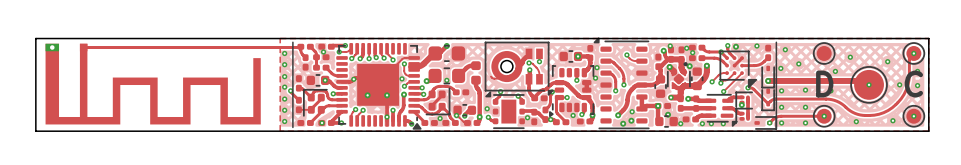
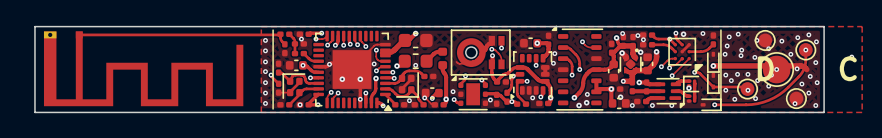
board edge: (887, 38) (928, 38) (928, 131) (887, 131) -> (824, 26) (824, 112)
via: none -> (738, 34)
via: none -> (808, 34)
via: none -> (797, 37)
via: none -> (756, 40)
part: (913, 53) -> none
via: (913, 53) -> none
via: none -> (781, 41)
via: none -> (816, 41)
track: (911, 56) (909, 79) (904, 94) (892, 107) (879, 114) (857, 114) (839, 102) (828, 99) (775, 99) (768, 103) -> (747, 89) (744, 87) (713, 87)
via: (850, 57) -> none
via: none -> (727, 45)
via: (887, 61) -> none
via: none -> (768, 48)
part: none -> (805, 50)
via: none -> (805, 50)
via: none -> (790, 54)
via: none -> (741, 55)
via: none -> (754, 57)
via: (835, 71) -> none
via: none -> (815, 62)
via: none -> (776, 69)
via: none -> (797, 68)
part position: (869, 84) -> (776, 69)
via: (869, 84) -> none
via: (899, 84) -> none
via: (917, 85) -> none
via: none -> (737, 74)
via: none -> (810, 76)
via: none -> (731, 80)
via: none -> (757, 80)
via: none -> (817, 82)
via: none -> (801, 84)
via: none -> (768, 86)
part: none -> (747, 89)
via: none -> (808, 93)
via: none -> (734, 99)
via: none -> (755, 98)
track: (824, 116) (779, 116) (769, 122) -> (805, 50) (805, 63) (802, 71) (779, 94) (757, 103) (714, 104)
part: (824, 116) -> none
via: (824, 116) -> none
part: none -> (796, 98)
part: (913, 116) -> none
via: (913, 116) -> none
via: (892, 120) -> none
via: (781, 122) -> none
via: (805, 122) -> none
via: (711, 123) -> none
via: none -> (815, 105)

